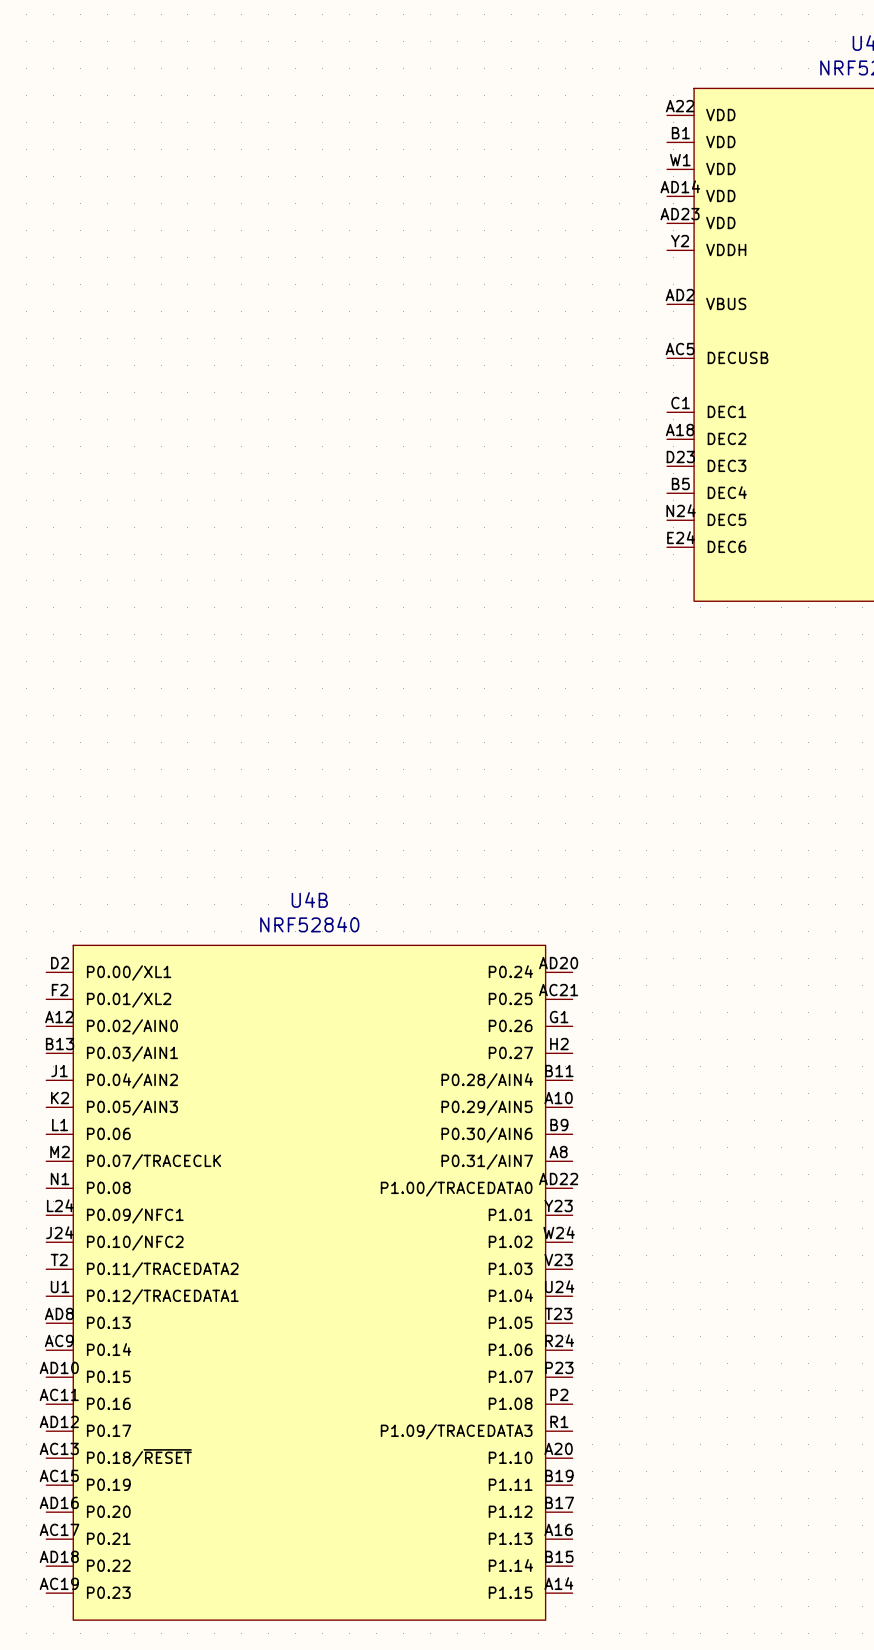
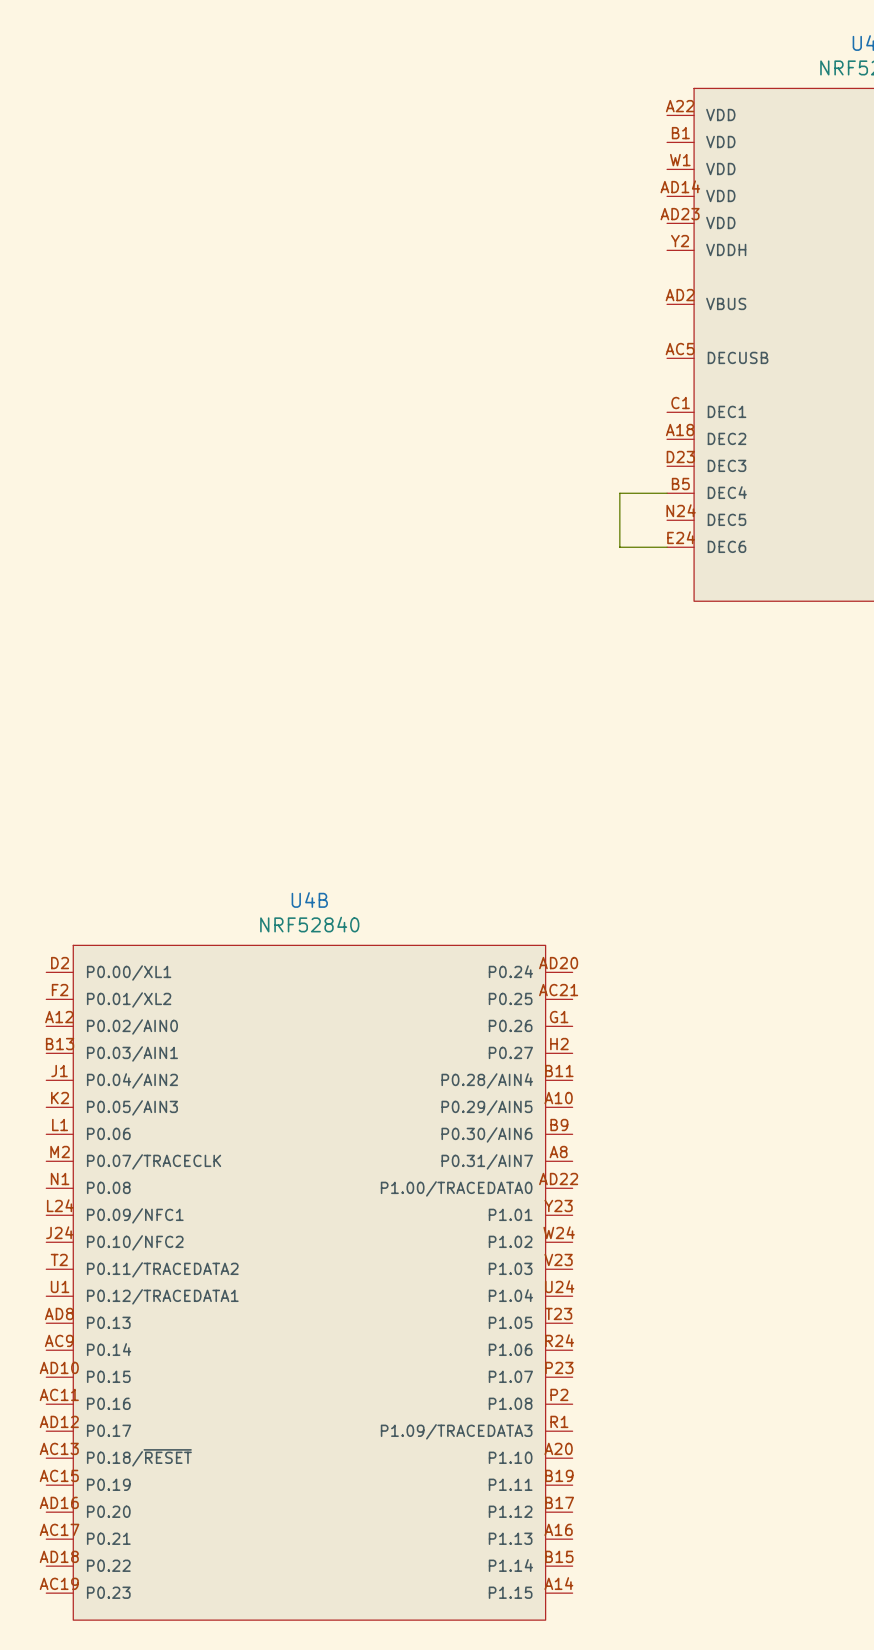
wire: none -> (667, 493) (619, 493) (619, 547) (667, 547)

